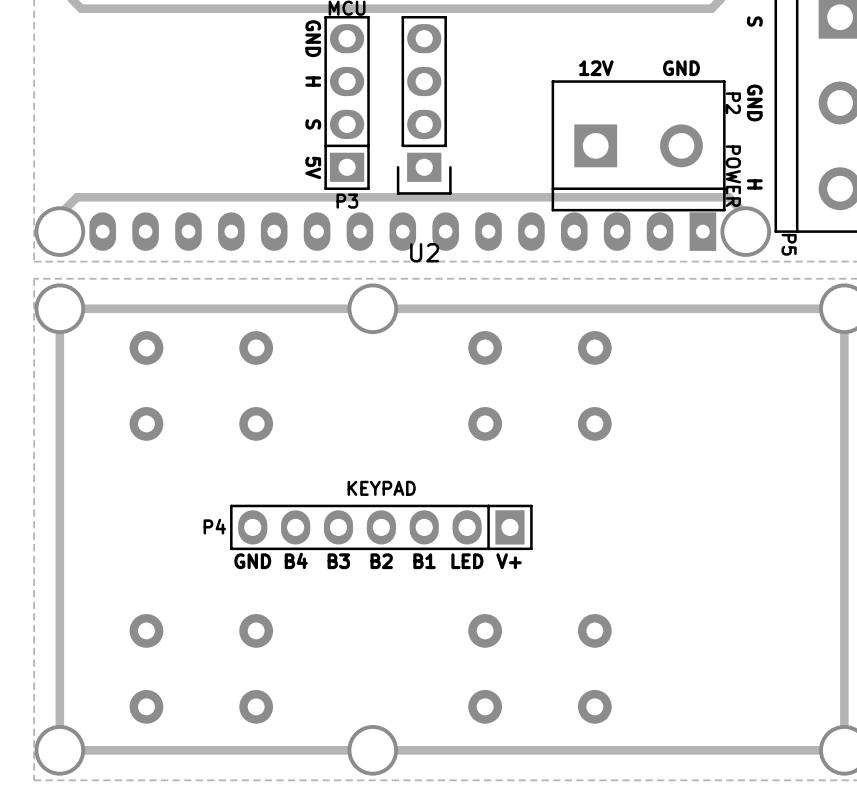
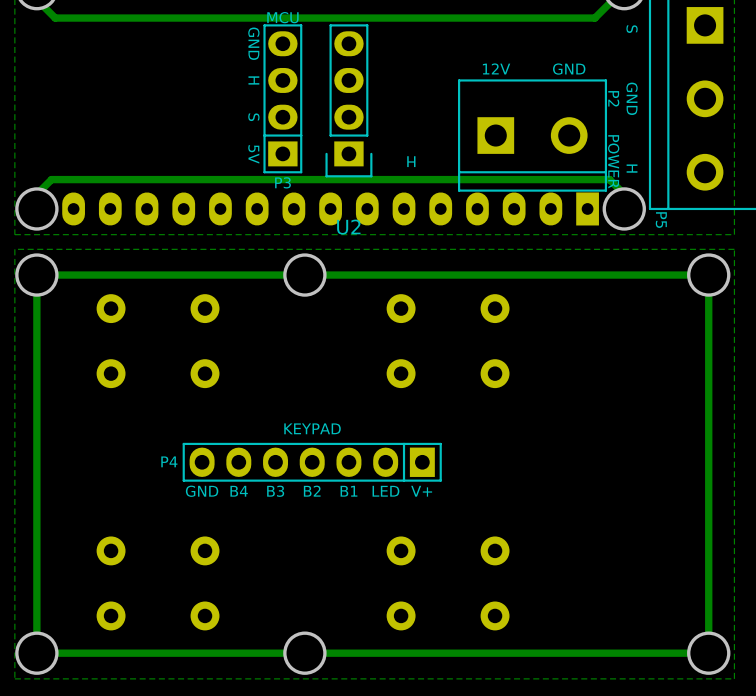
text: none -> H (411, 161)

